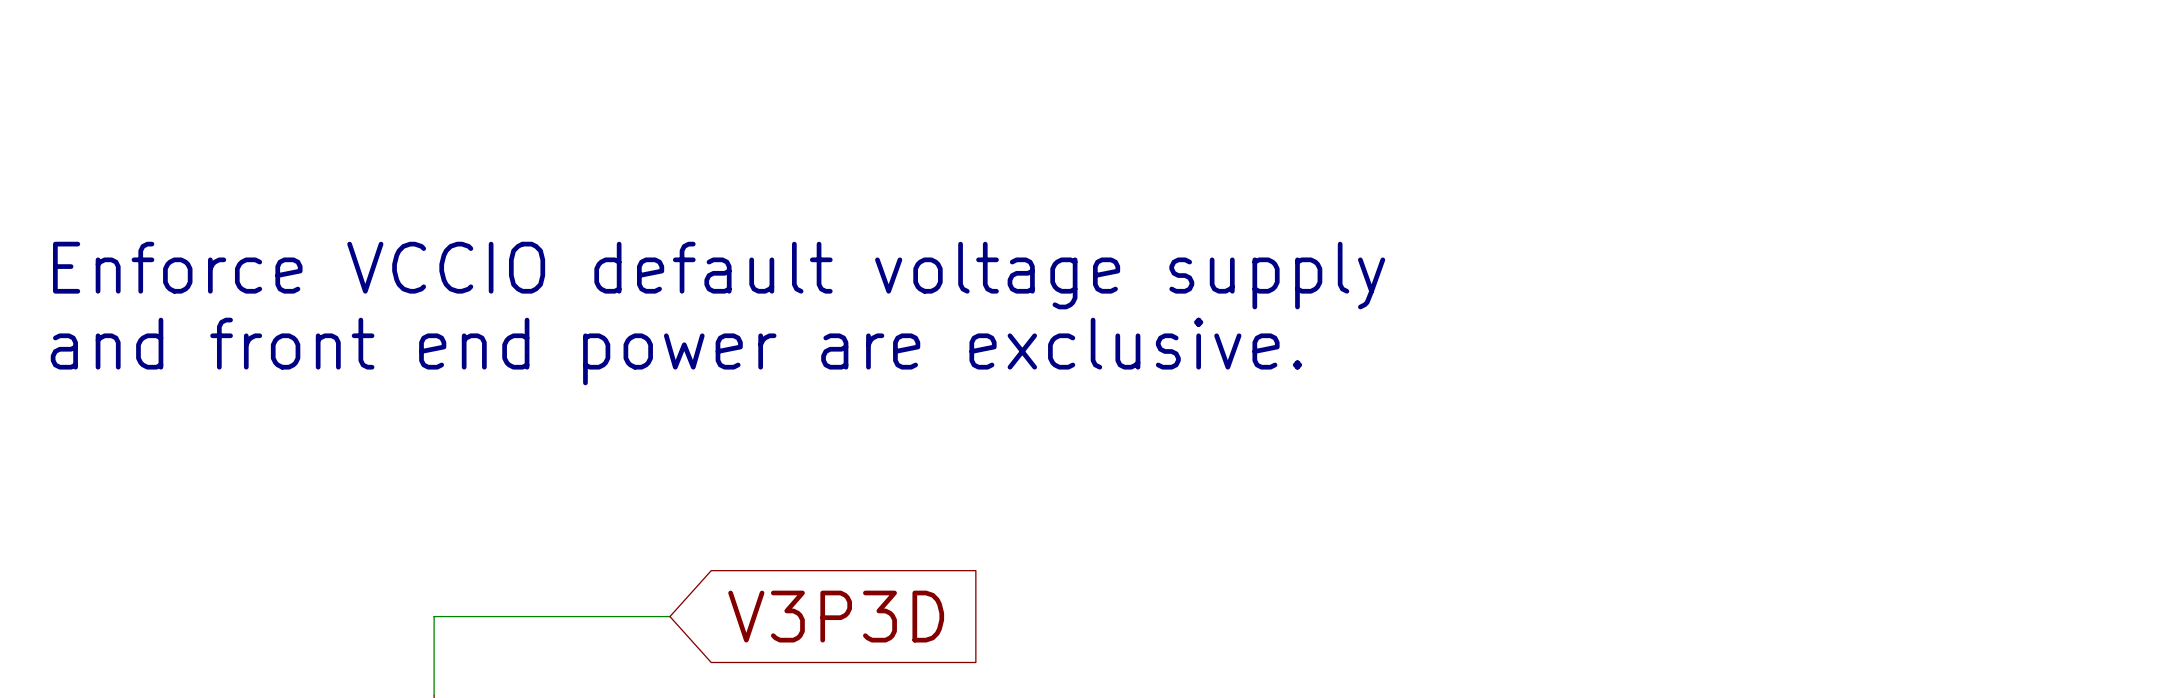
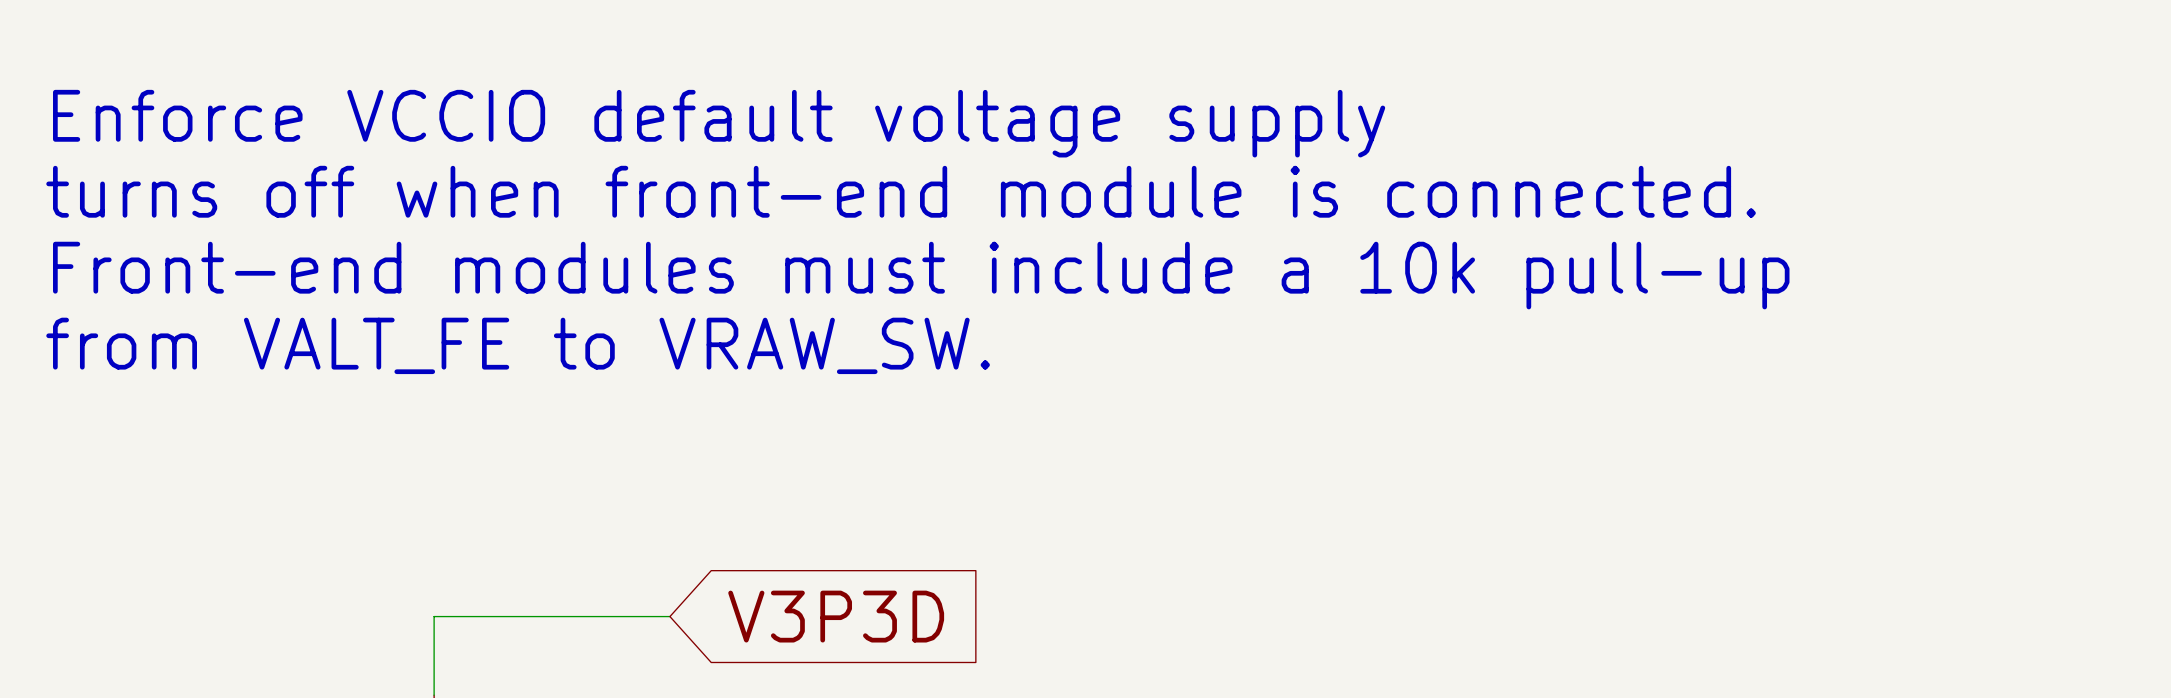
text: none -> Enforce VCCIO default voltage supply (719, 123)
text: none -> turns off when front-end module is connected. (901, 191)
text: Enforce VCCIO default voltage supply (719, 275) -> Front-end modules must include a 10k pull-up (921, 275)
text: and front end power are exclusive. (676, 351) -> from VALT_FE to VRAW_SW. (518, 345)

